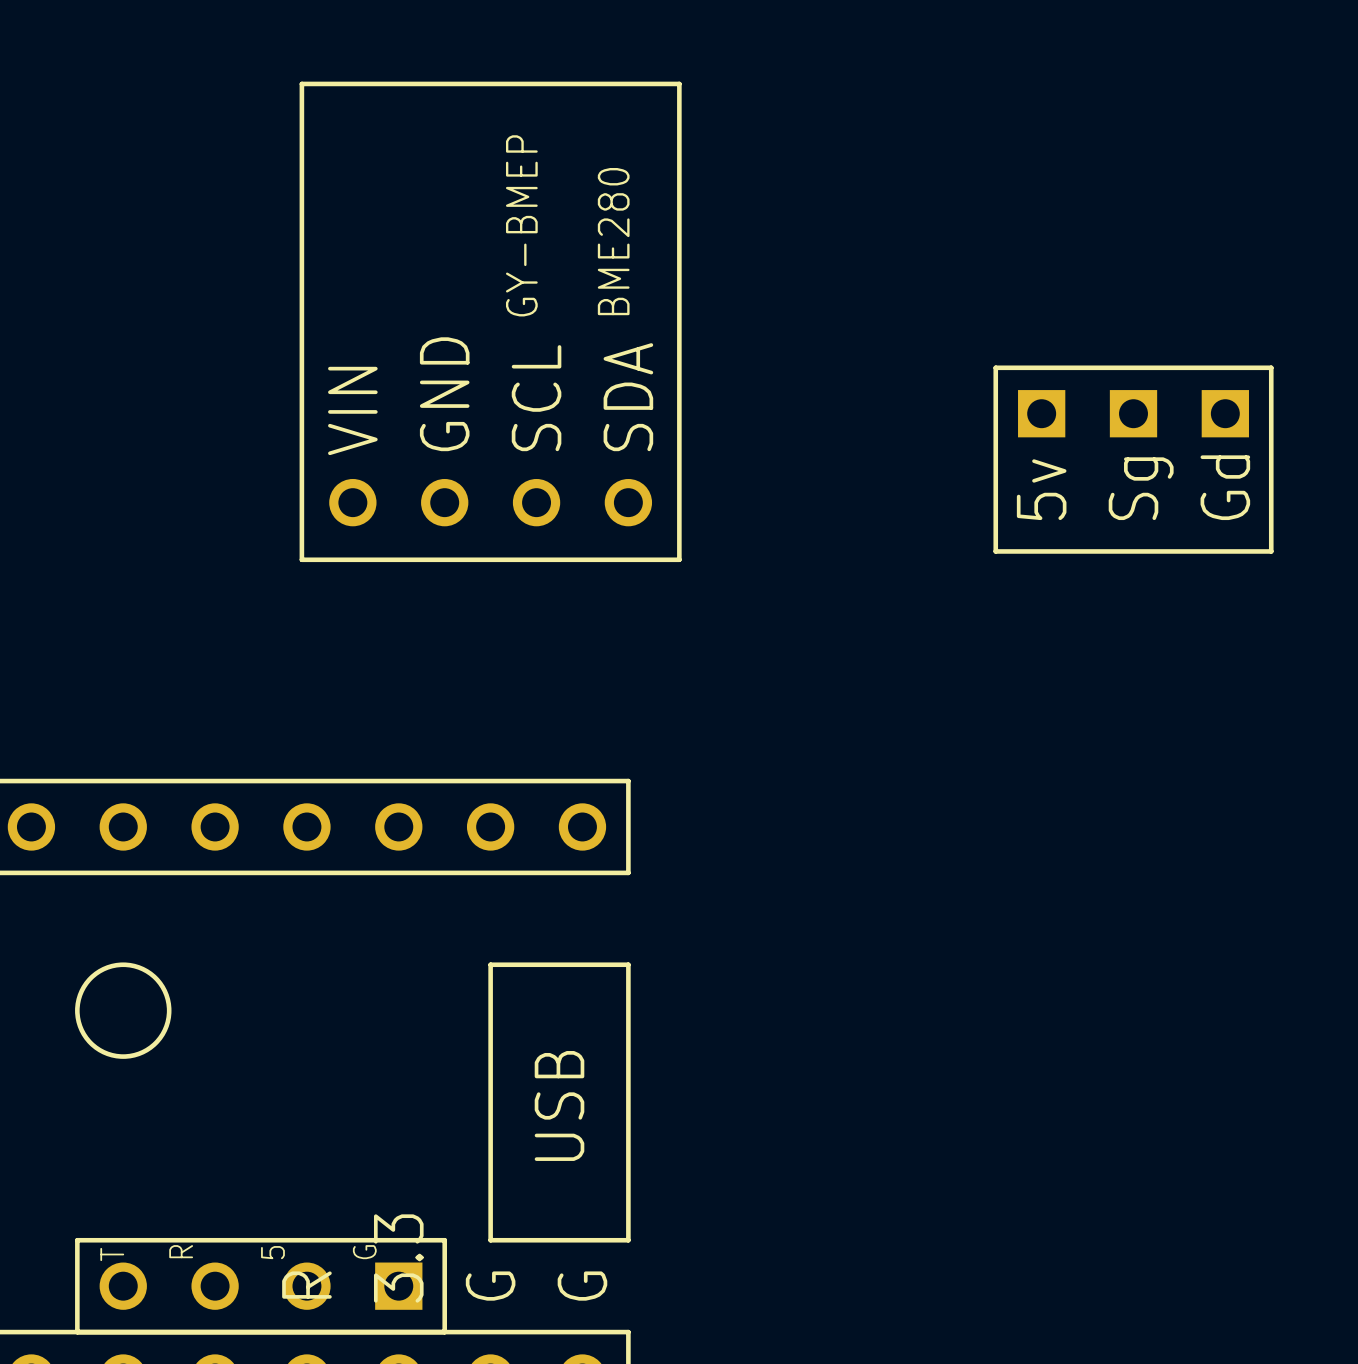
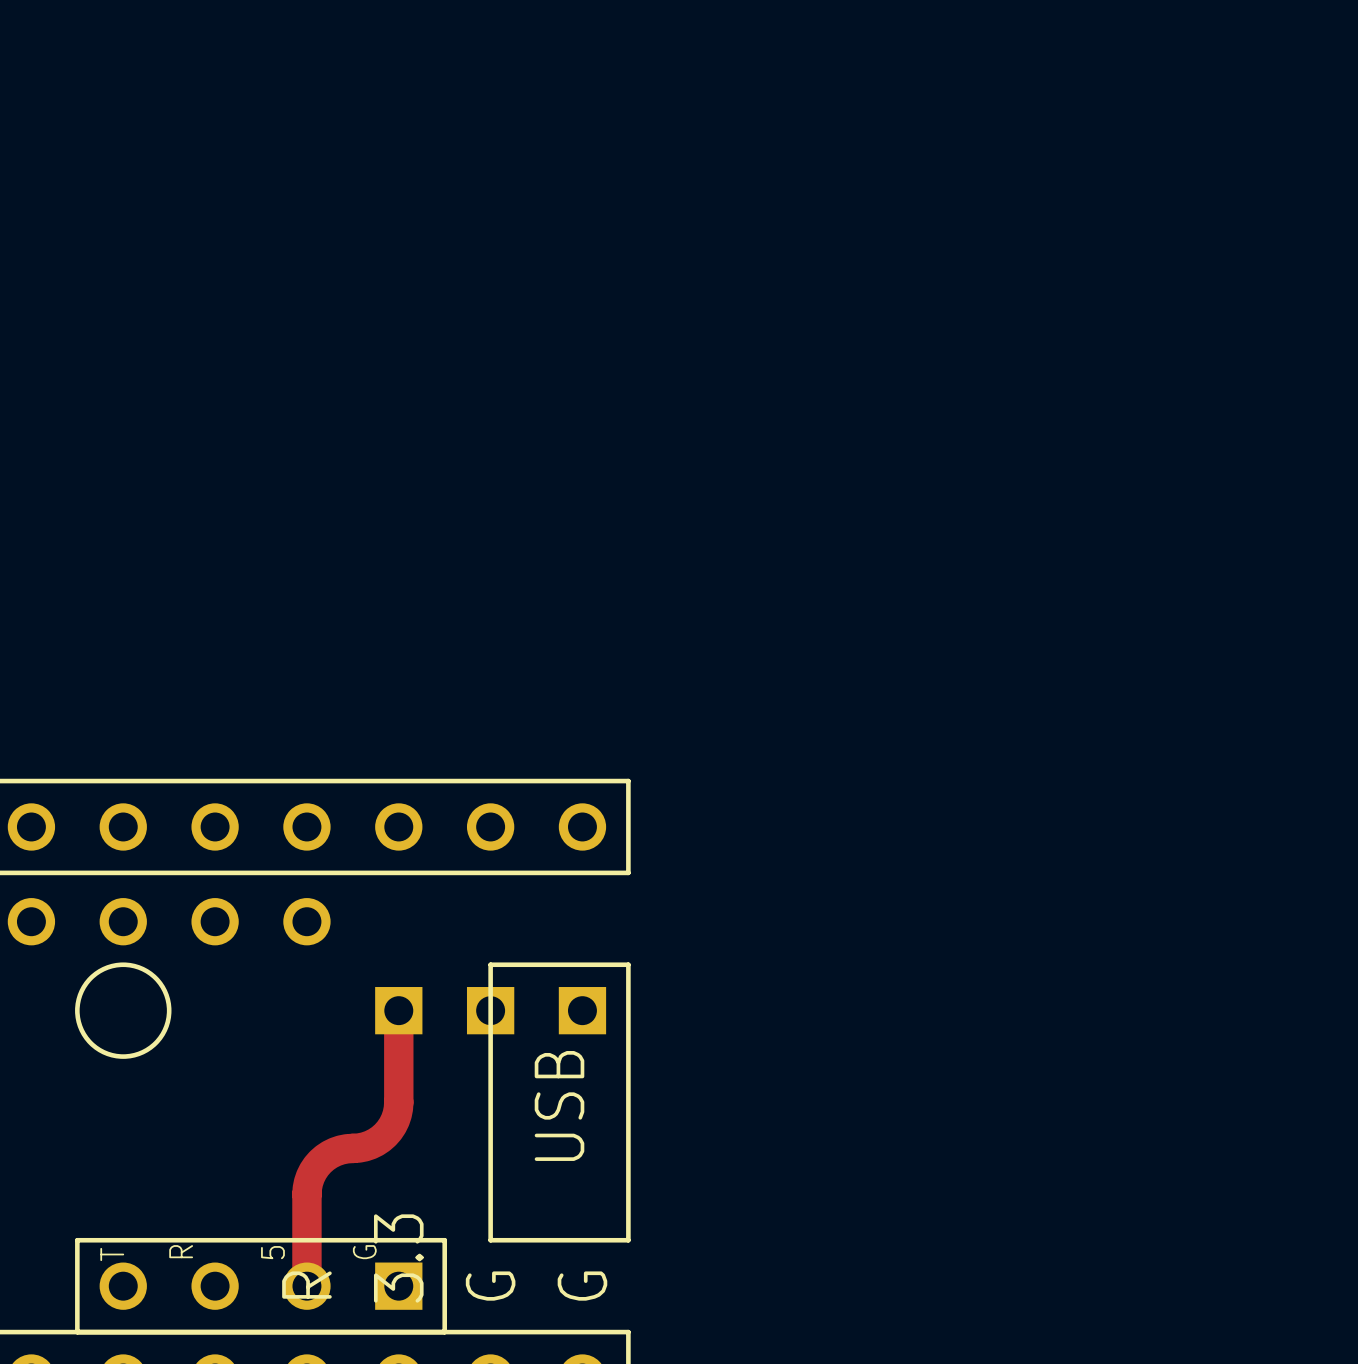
part side: top (490, 321) -> bottom (169, 921)
part side: top (1133, 459) -> bottom (490, 1010)
track: none -> (398, 1010) (398, 1102) (397, 1114) (392, 1125) (385, 1134) (370, 1144) (340, 1149) (324, 1157) (316, 1166) (308, 1182) (306, 1286)

